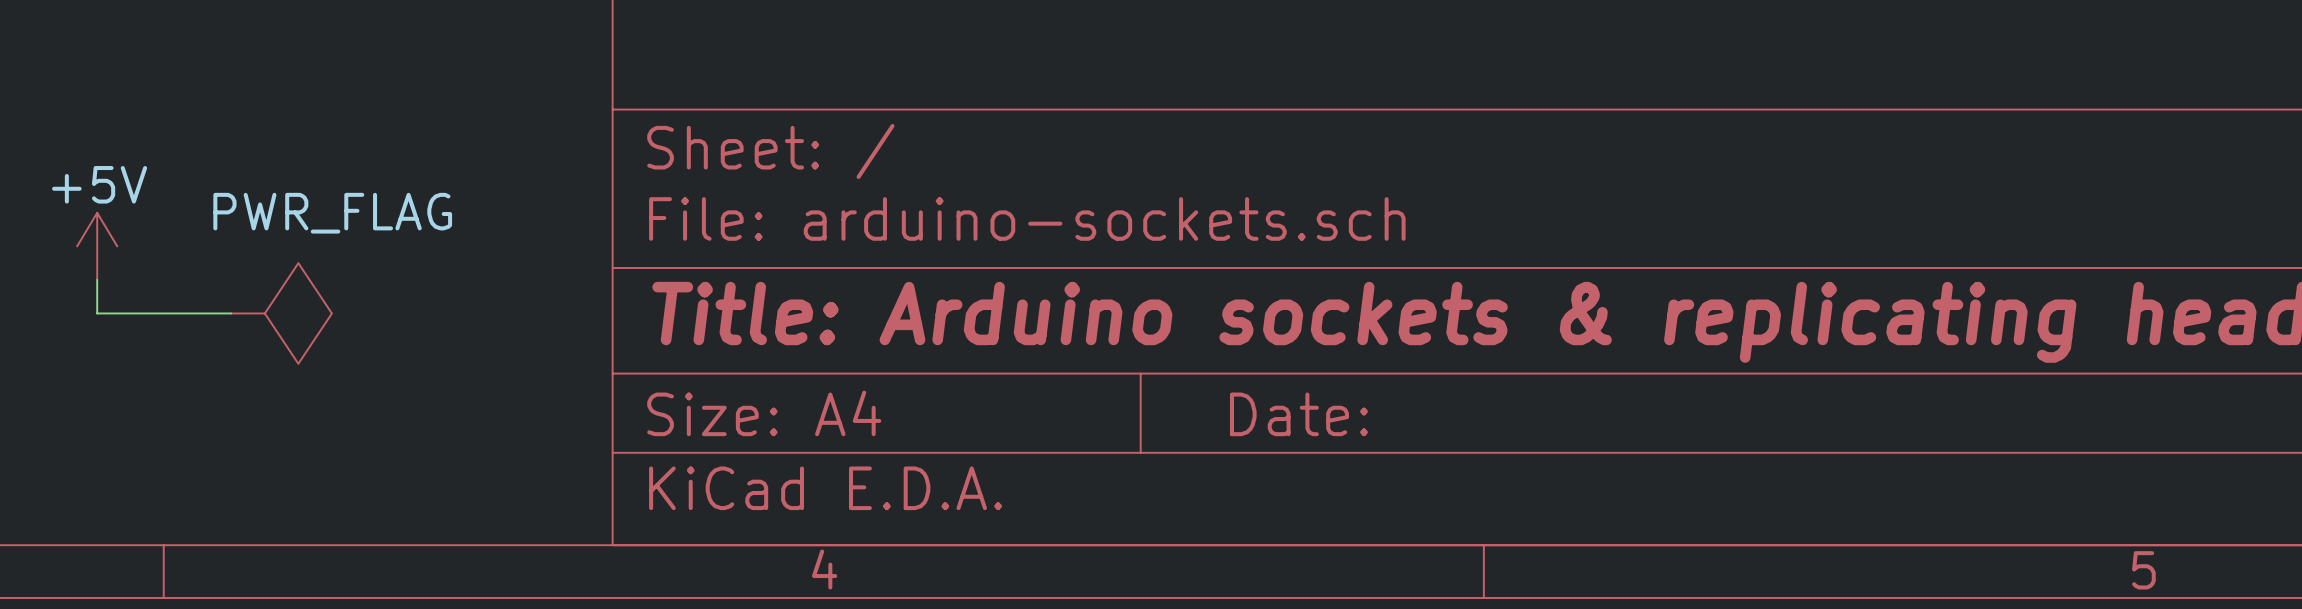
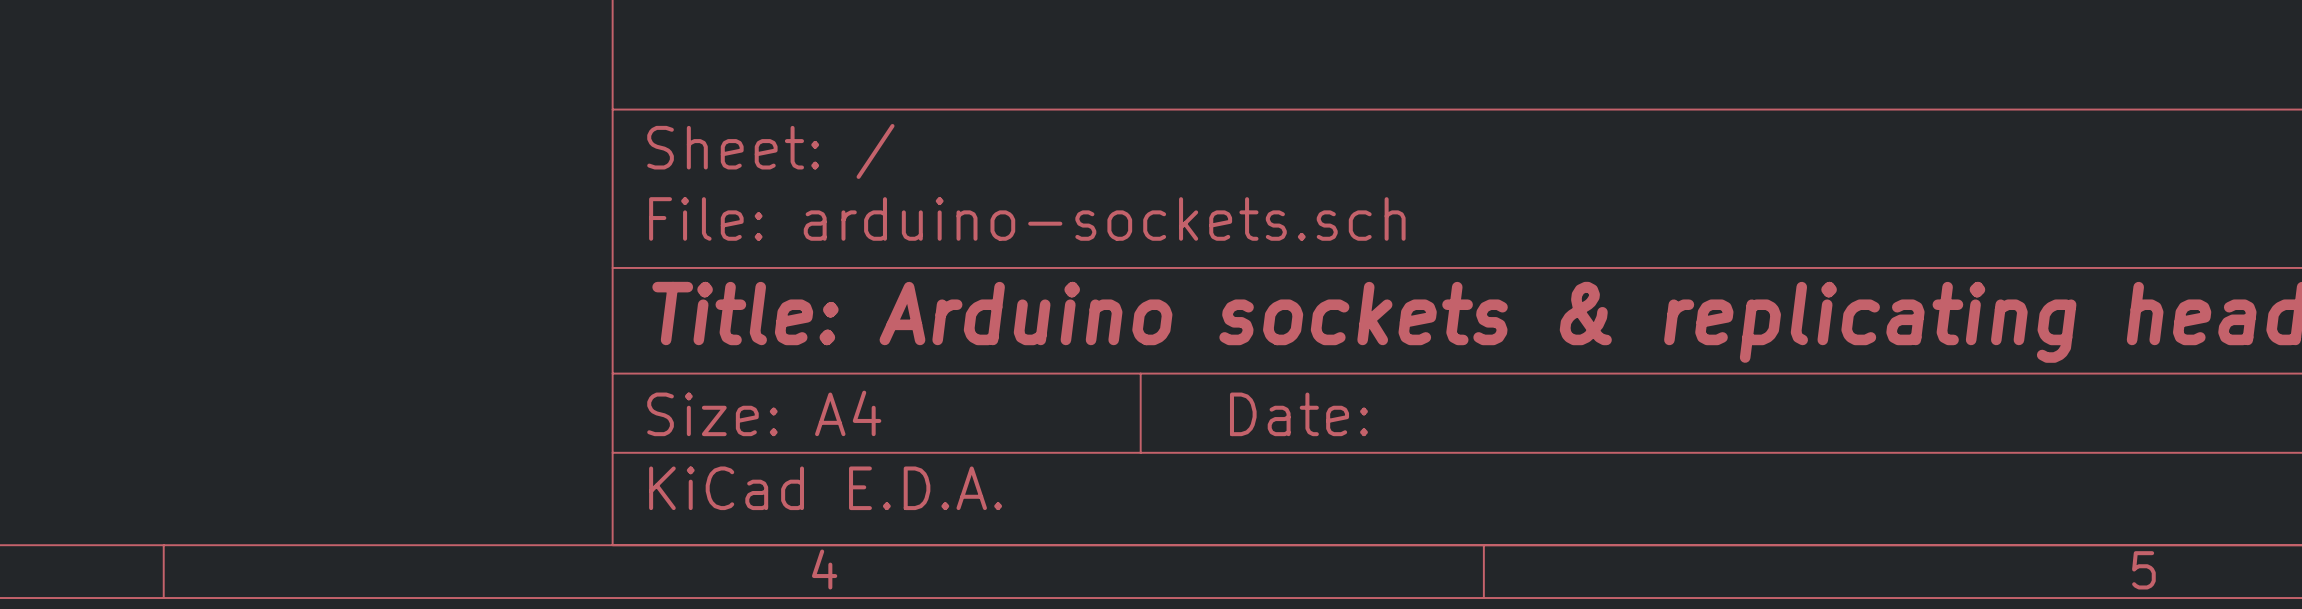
power symbol: +5V (97, 246) -> none
wire: (97, 279) (97, 313) (231, 313) -> none
power symbol: PWR_FLAG (281, 313) -> none

